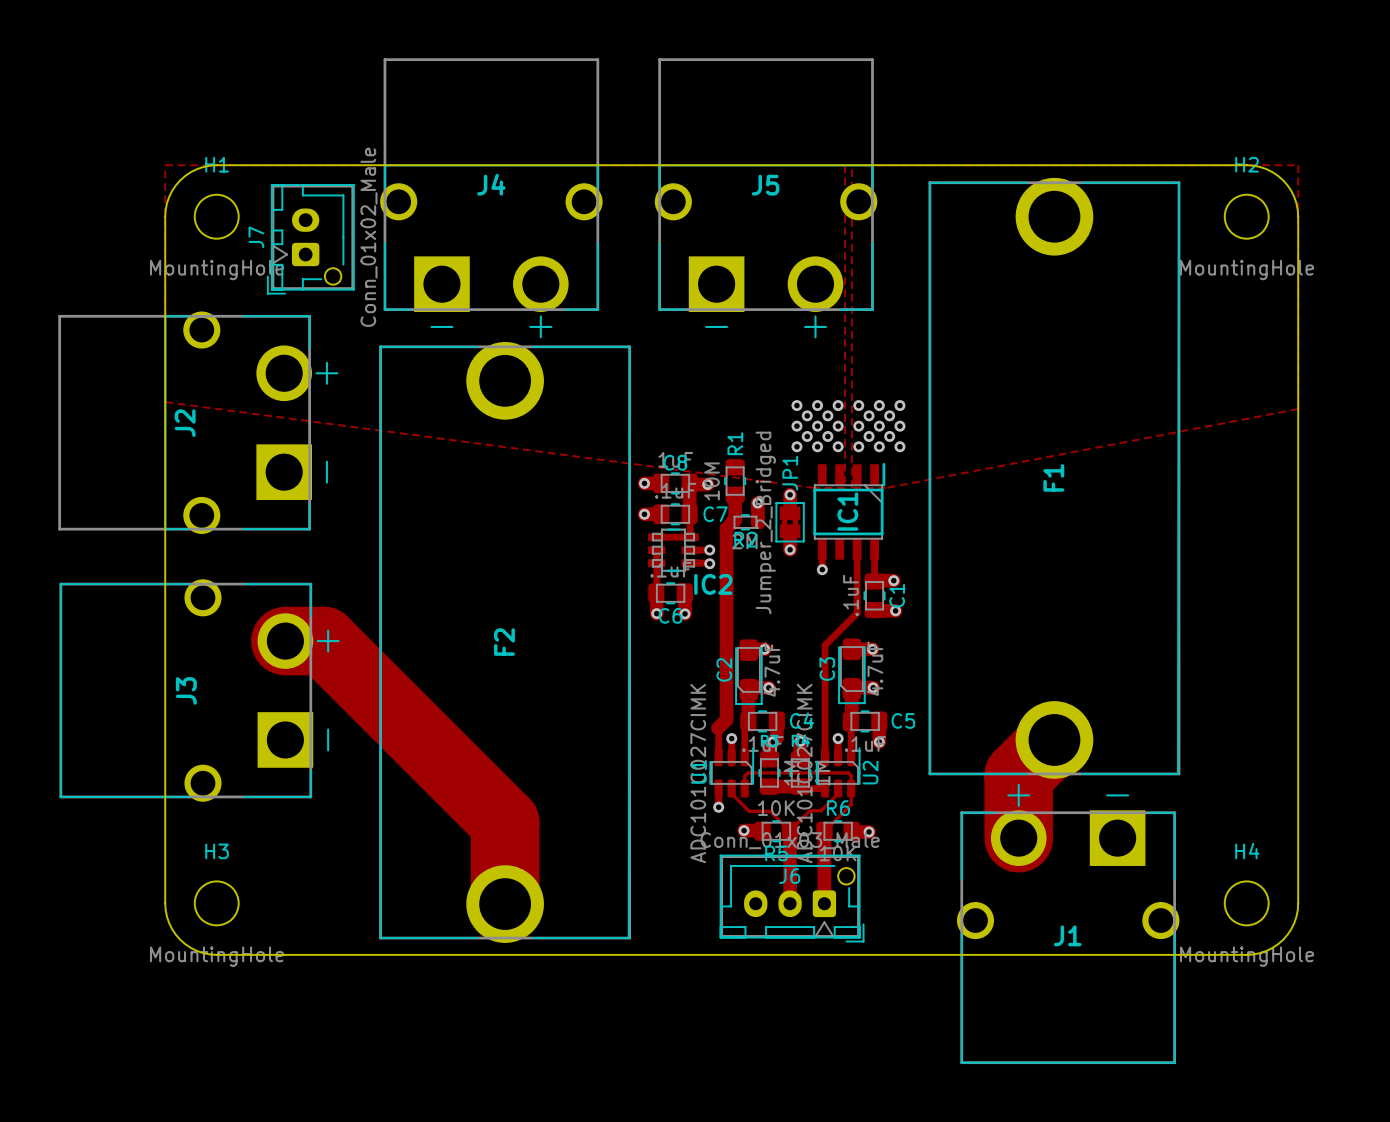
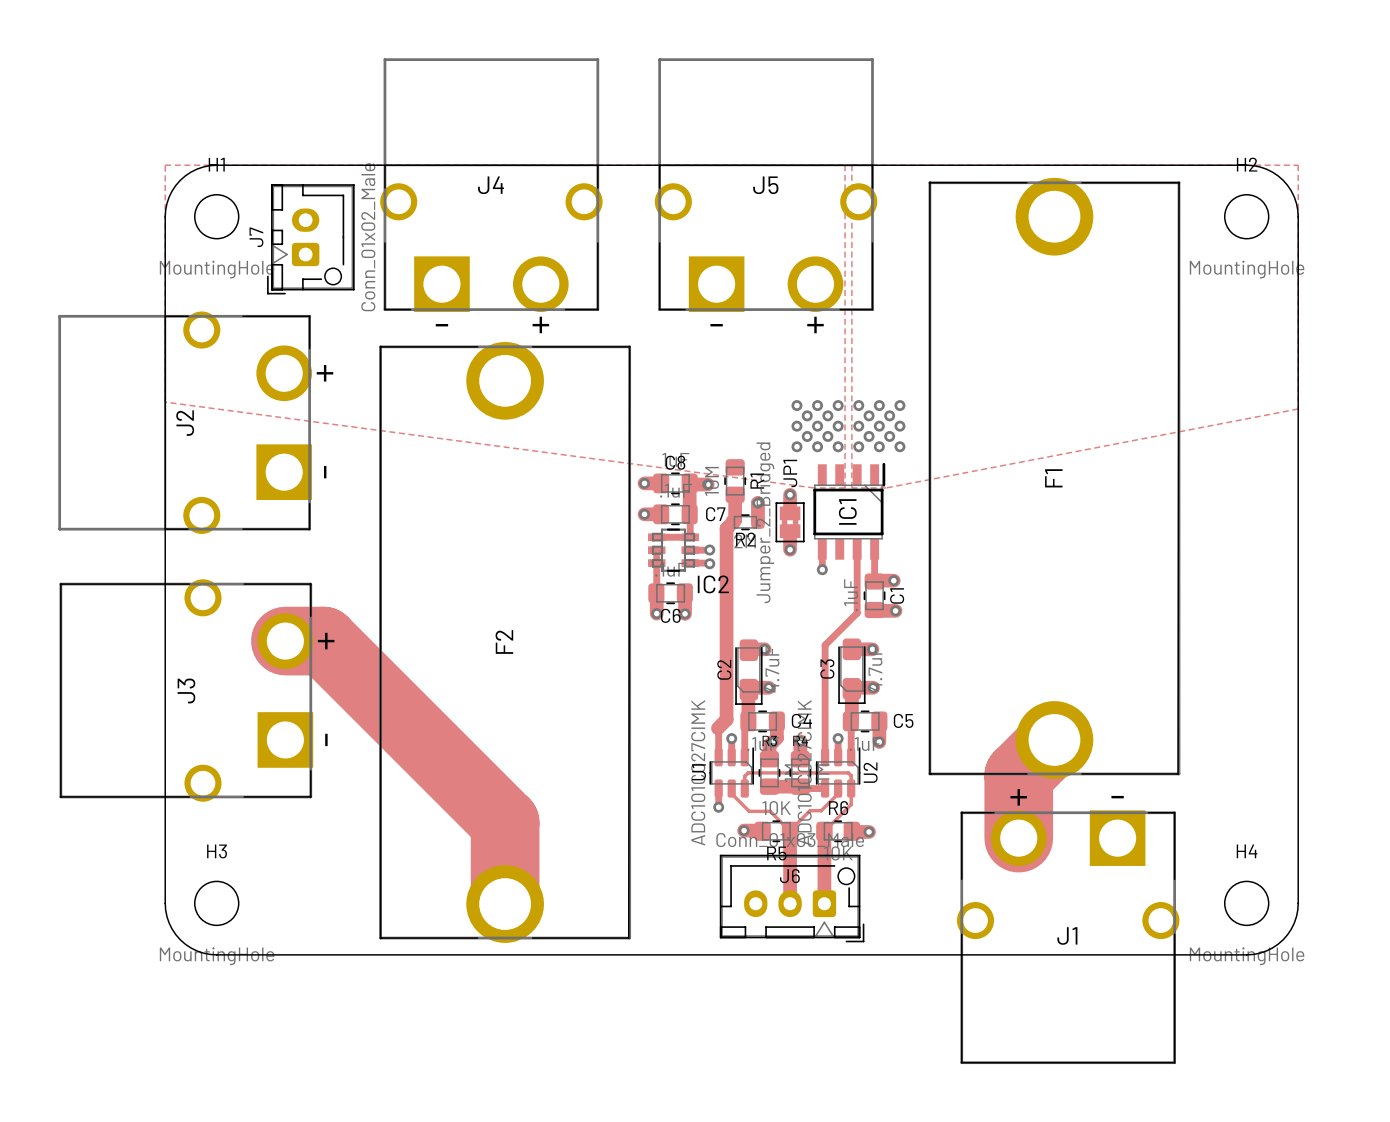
R1 name position: R1 (735, 443) -> R1 (757, 481)

